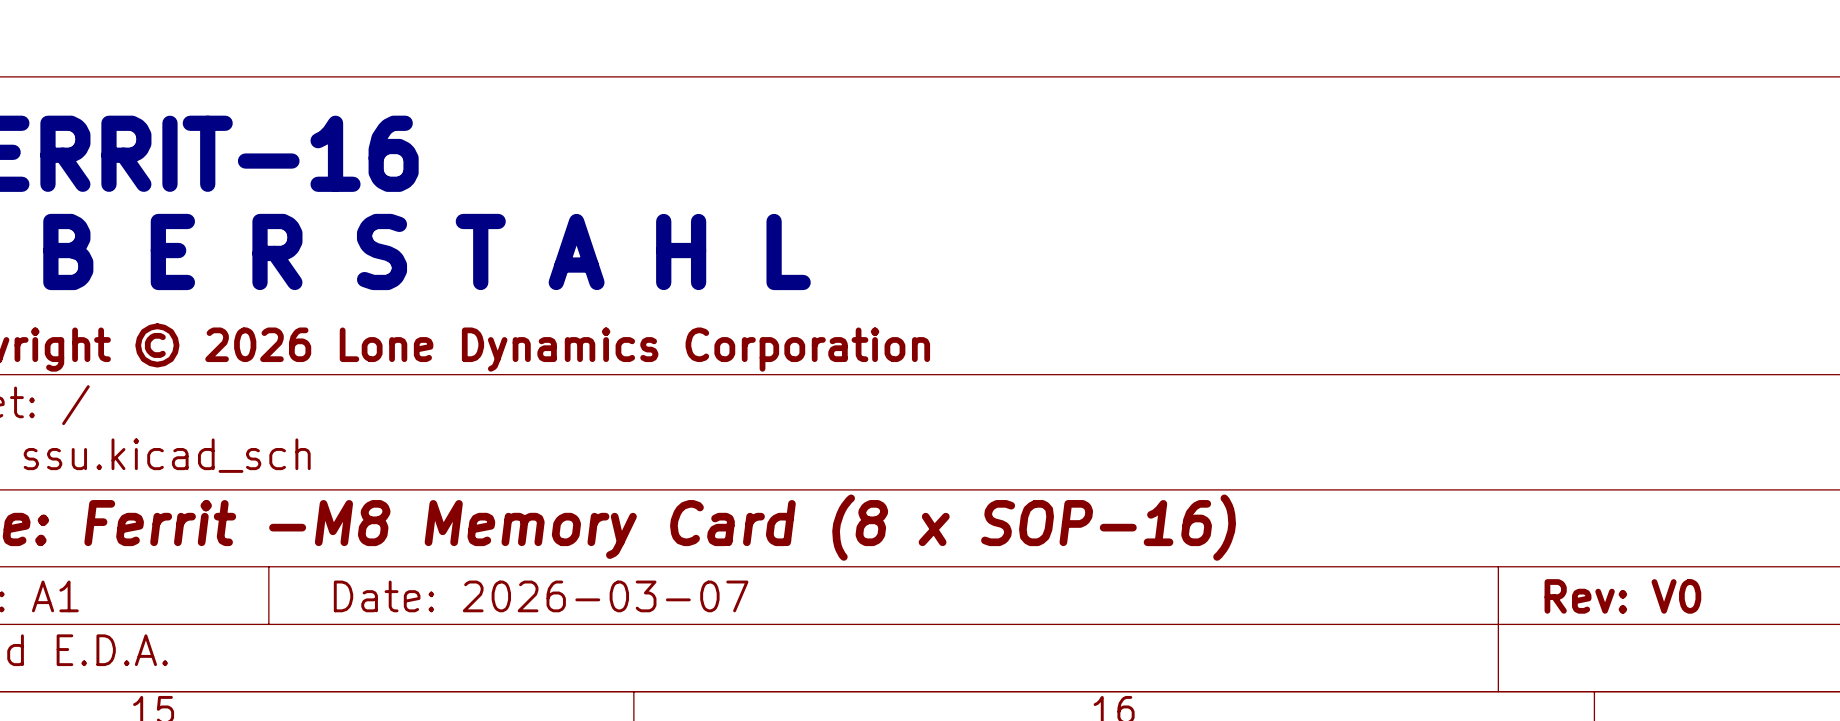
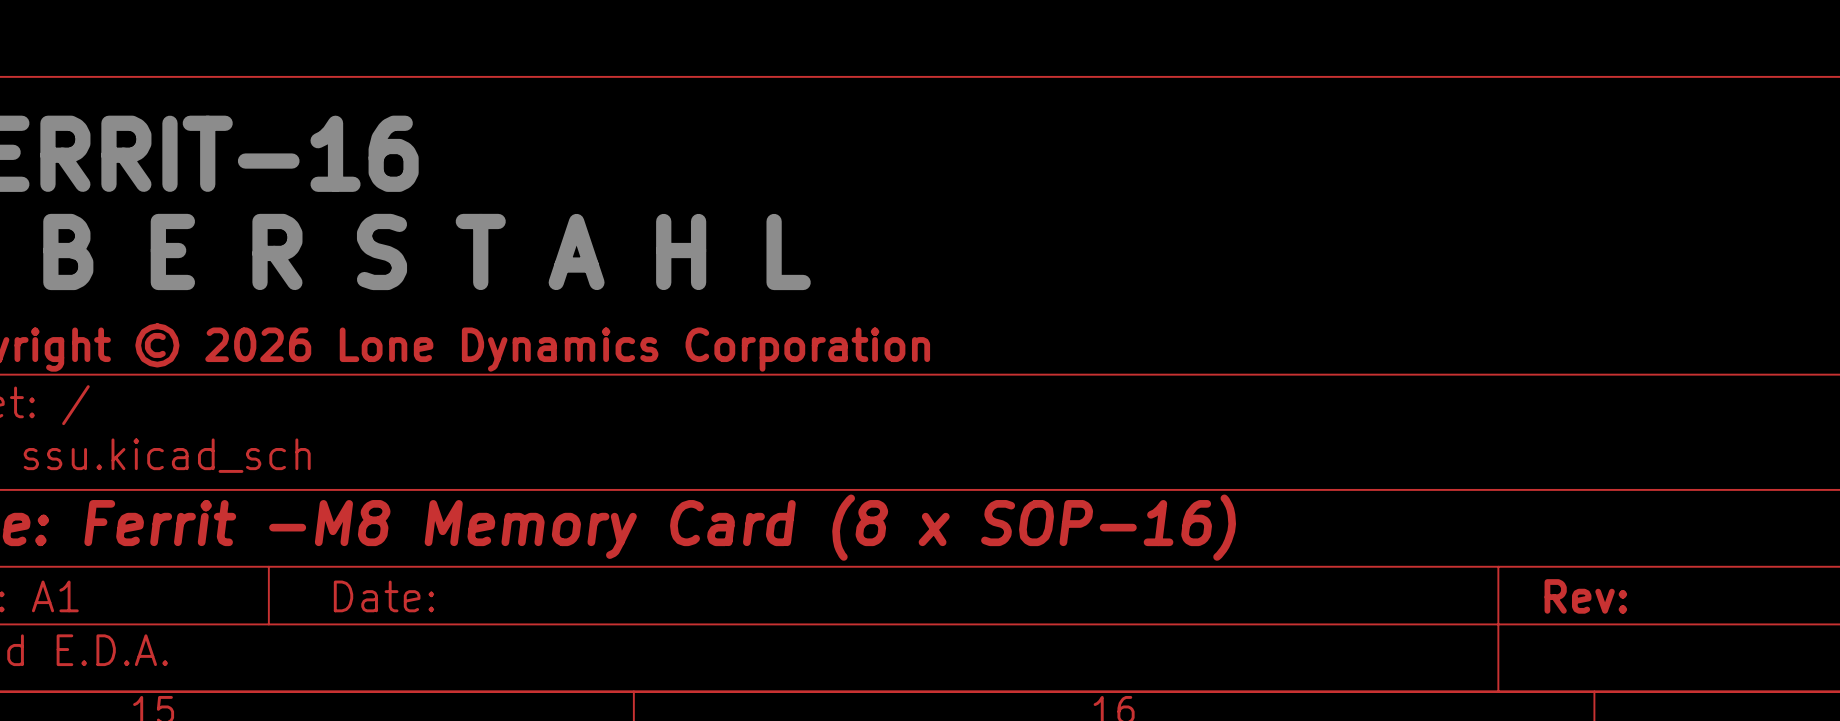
title block: Date: 2026-03-07 (541, 596) -> Date: (384, 596)
title block: Rev: V0 (1622, 596) -> Rev: (1585, 596)

